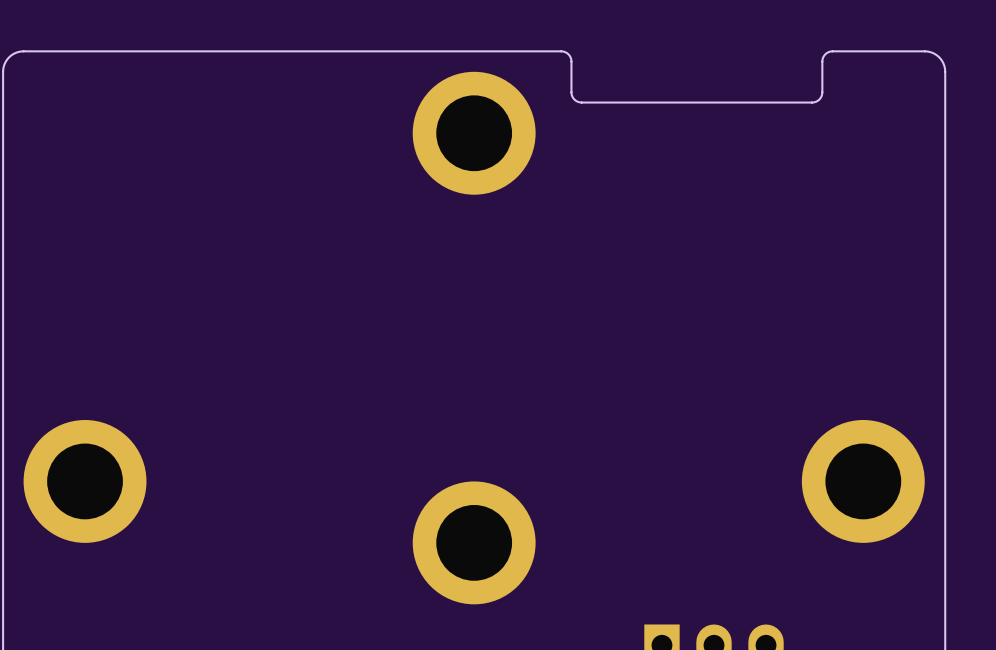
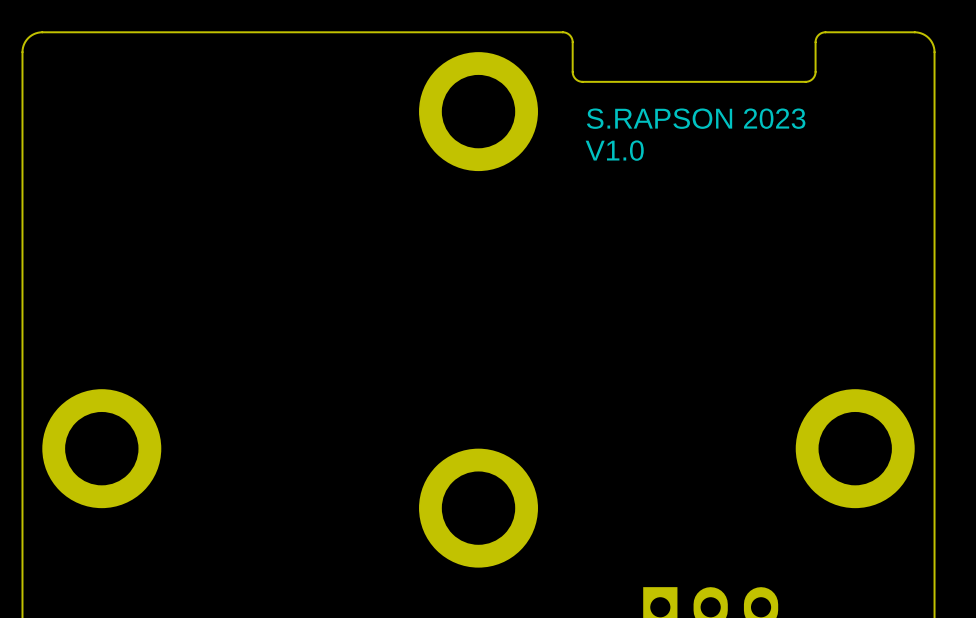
text: none -> S.RAPSON 2023 (696, 118)
text: none -> V1.0 (614, 150)

